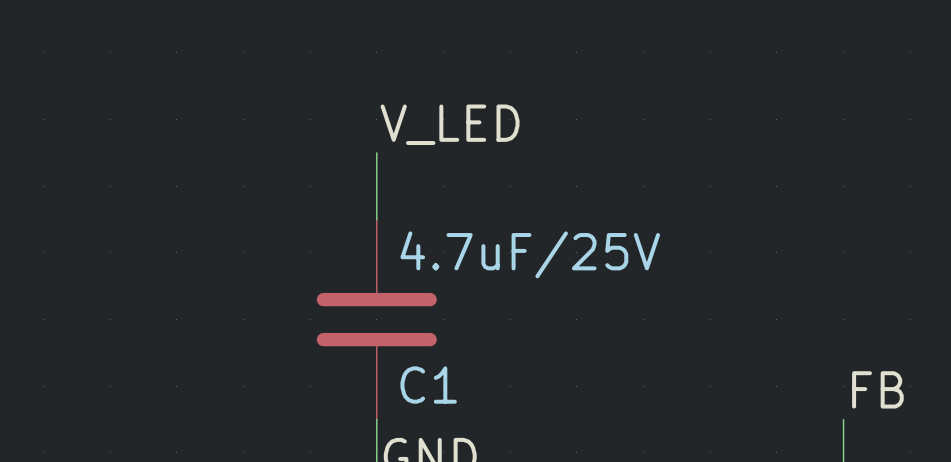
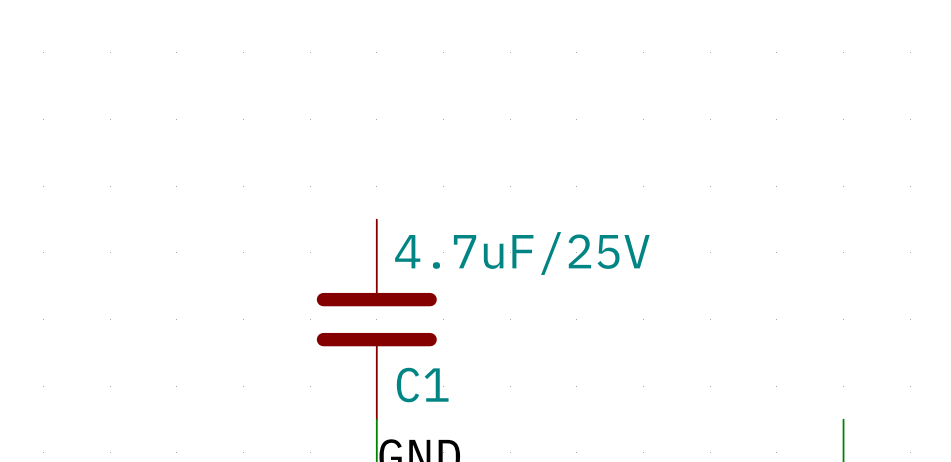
label: V_LED (450, 124) -> none
wire: (376, 152) (376, 219) -> none
label: FB (877, 389) -> none

